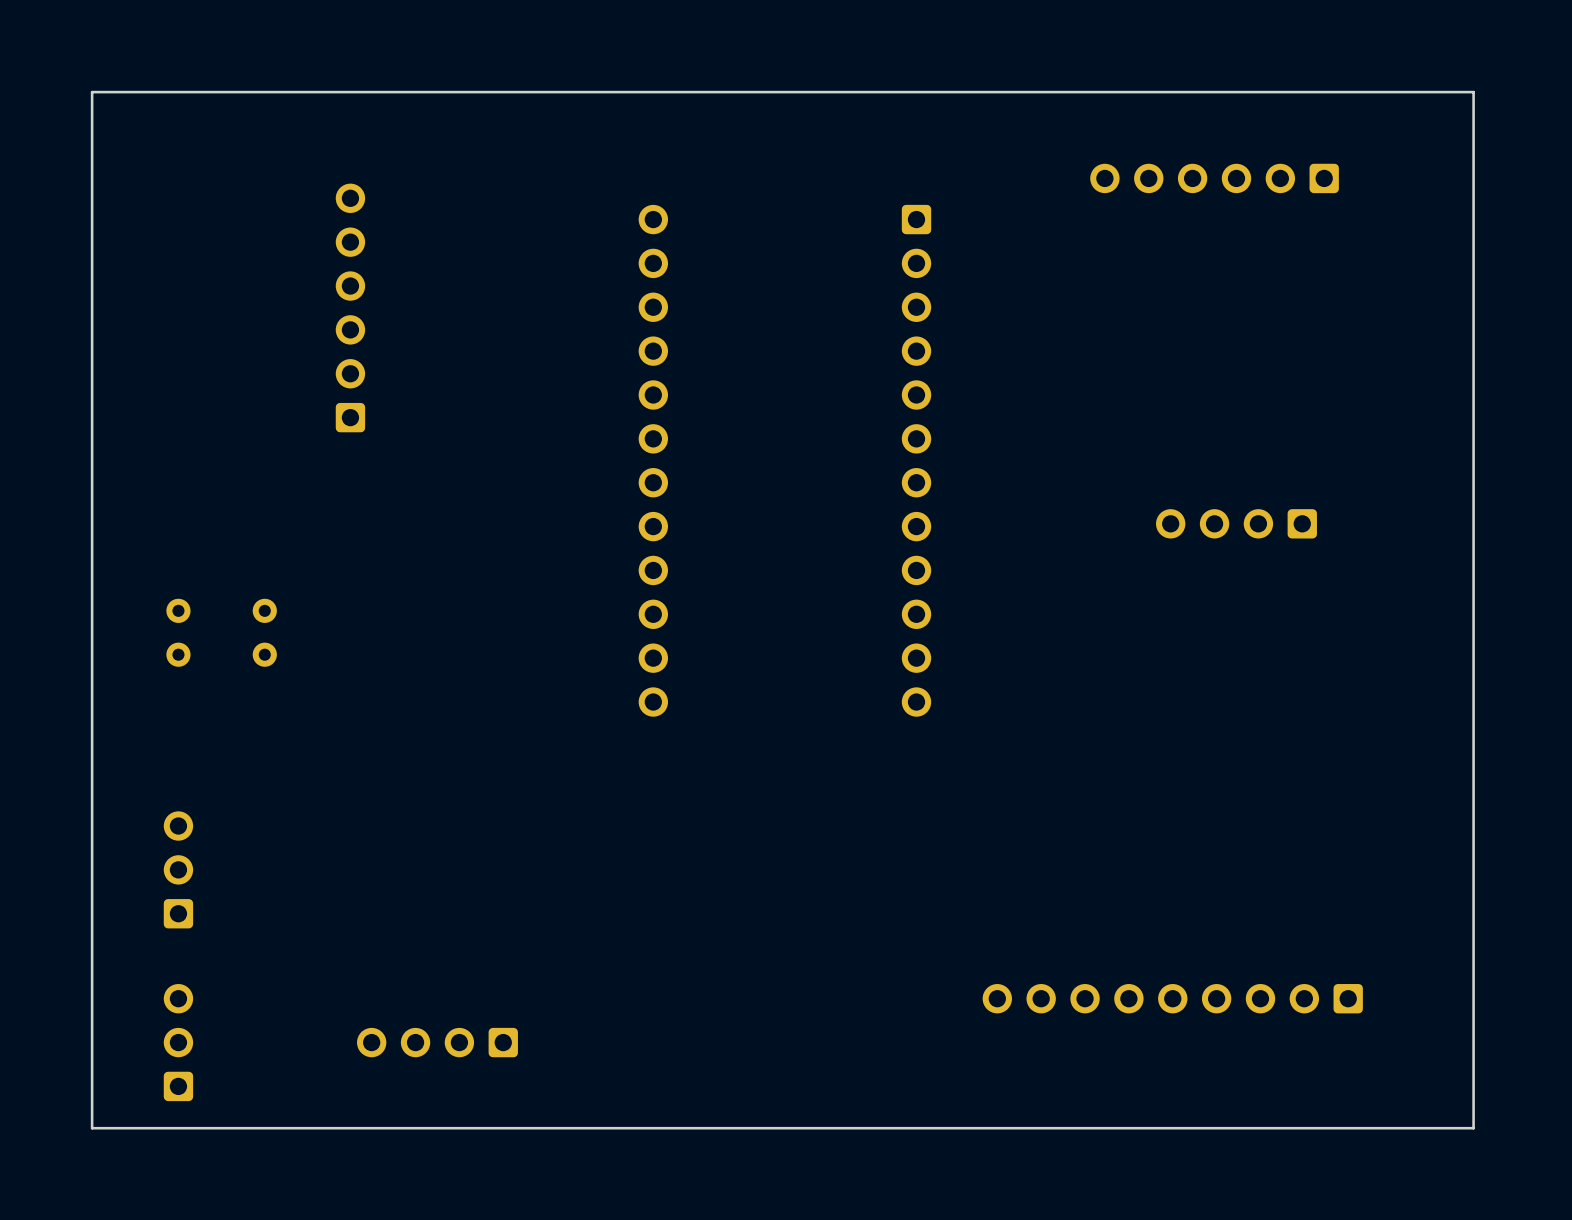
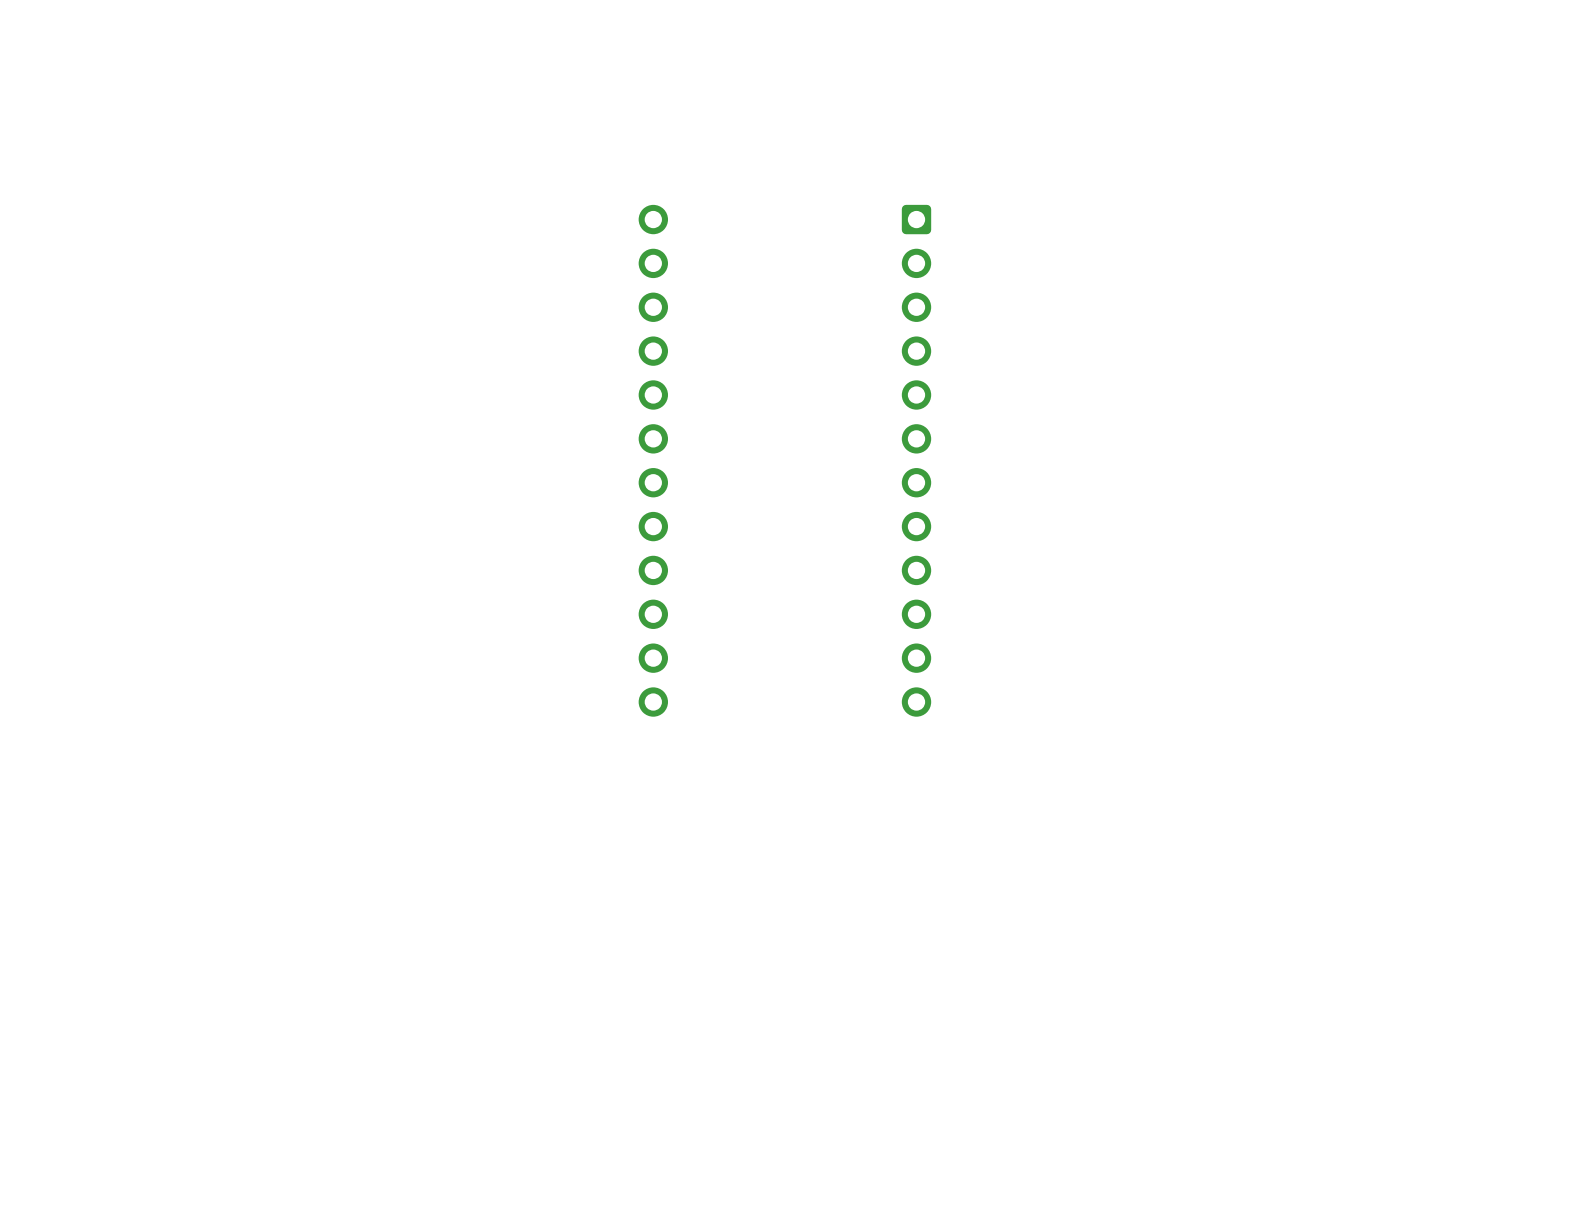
board edge: (1473, 92) (92, 92) (92, 1128) (1473, 1128) (1473, 92) -> none
part: (1214, 178) -> none
part: (350, 307) -> none
part: (1236, 523) -> none
part: (178, 632) -> none
part: (264, 632) -> none
part: (178, 869) -> none
part: (1172, 998) -> none
part: (178, 1042) -> none
part: (437, 1042) -> none

